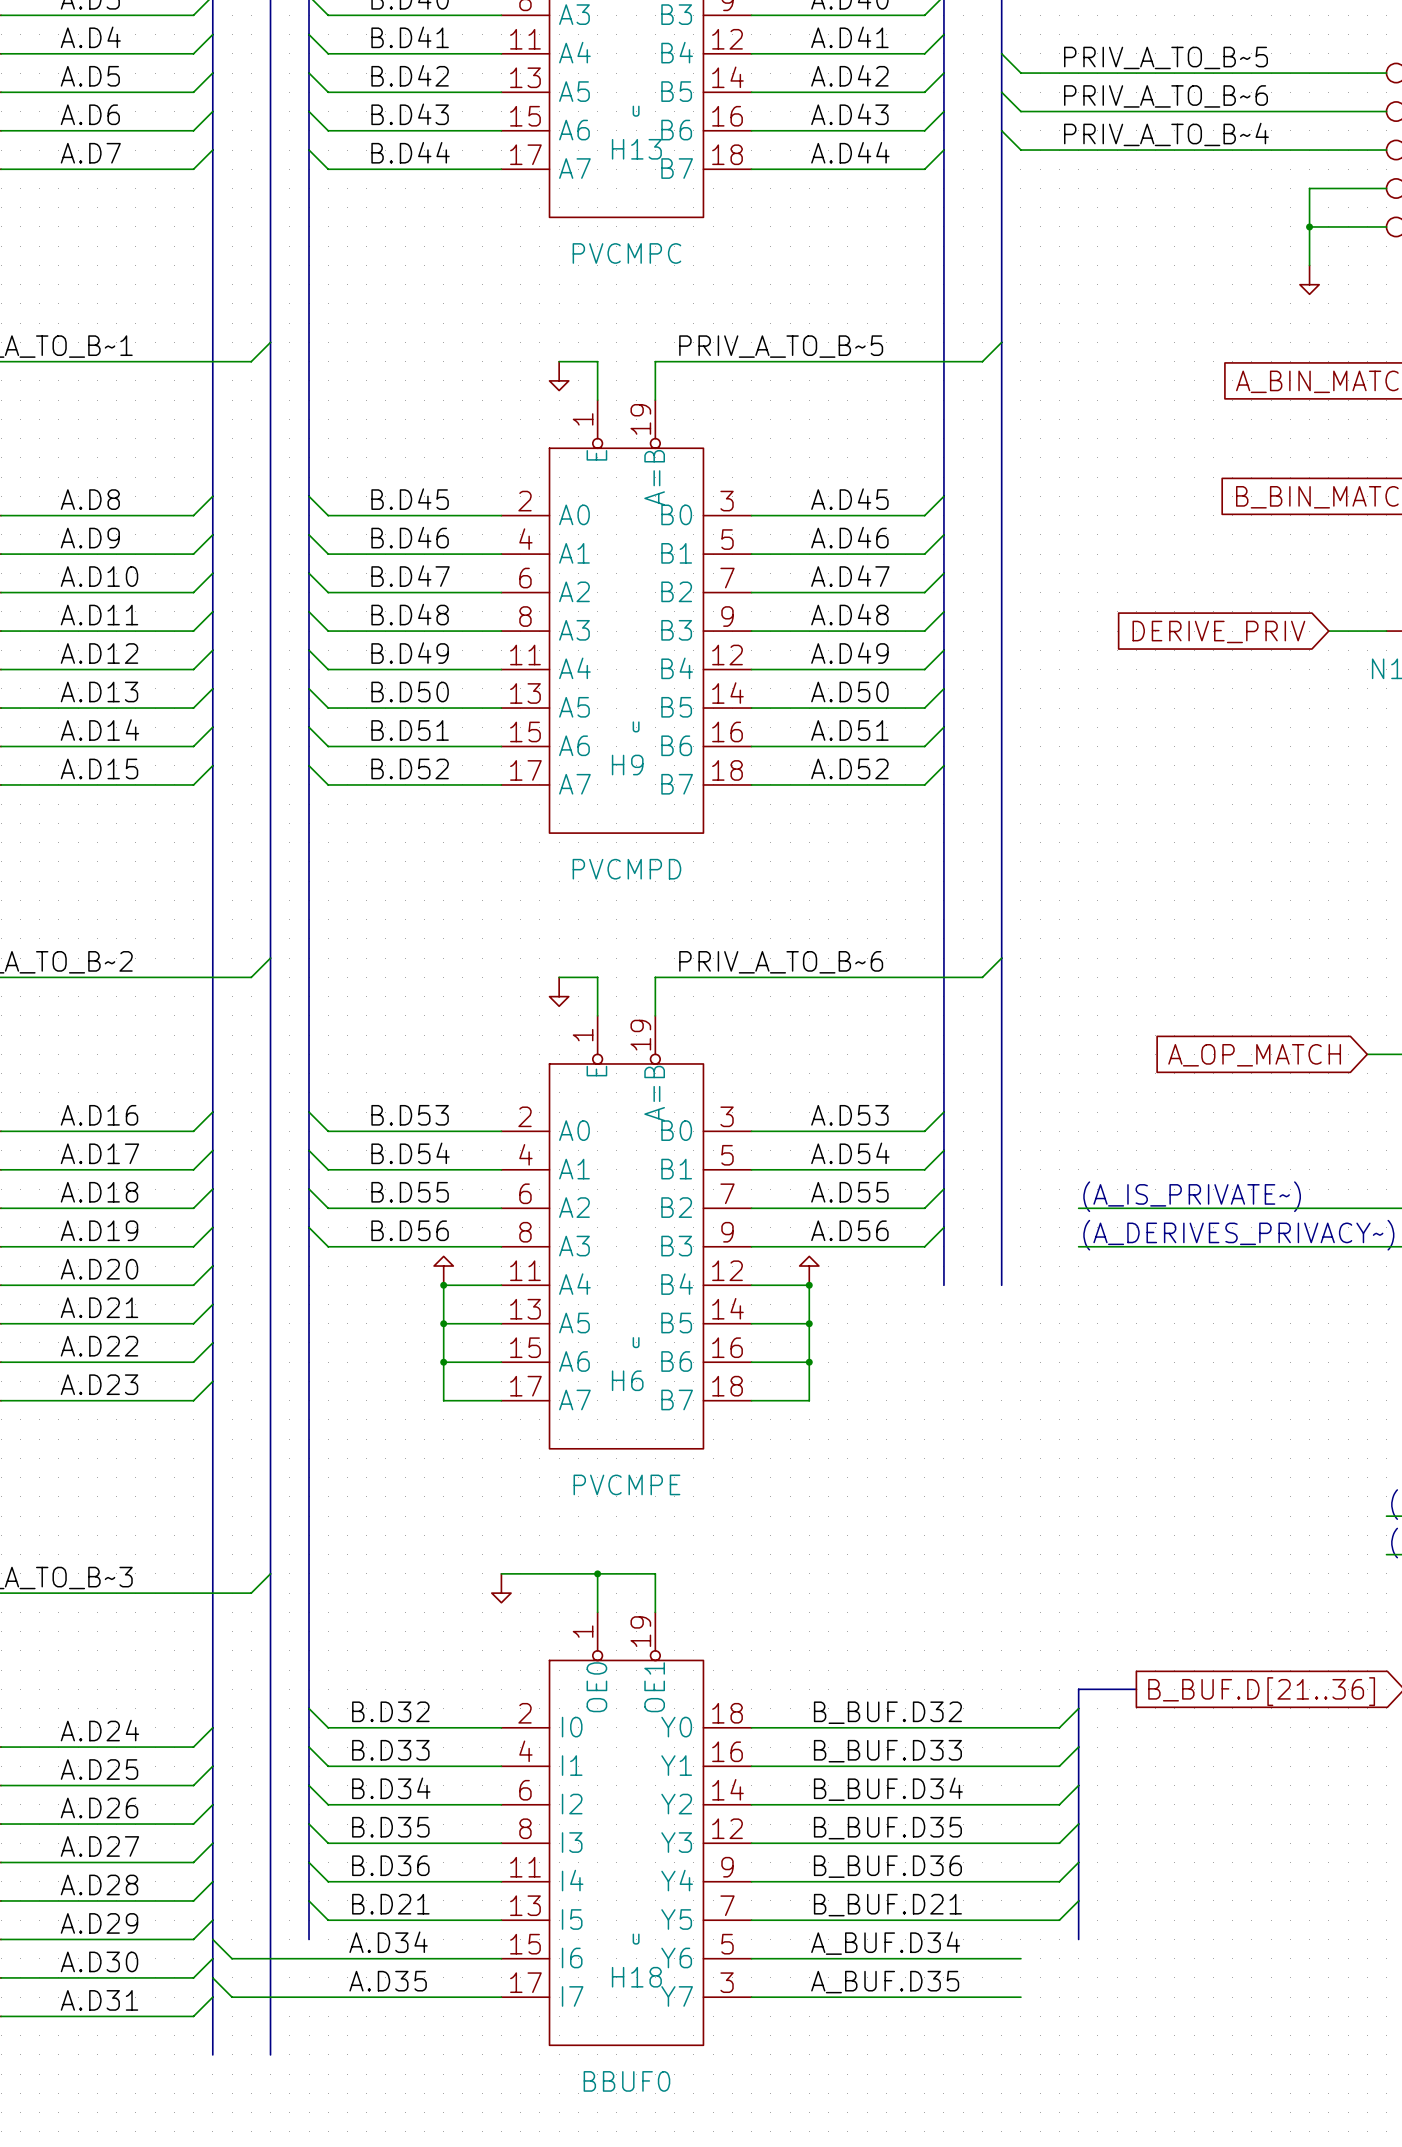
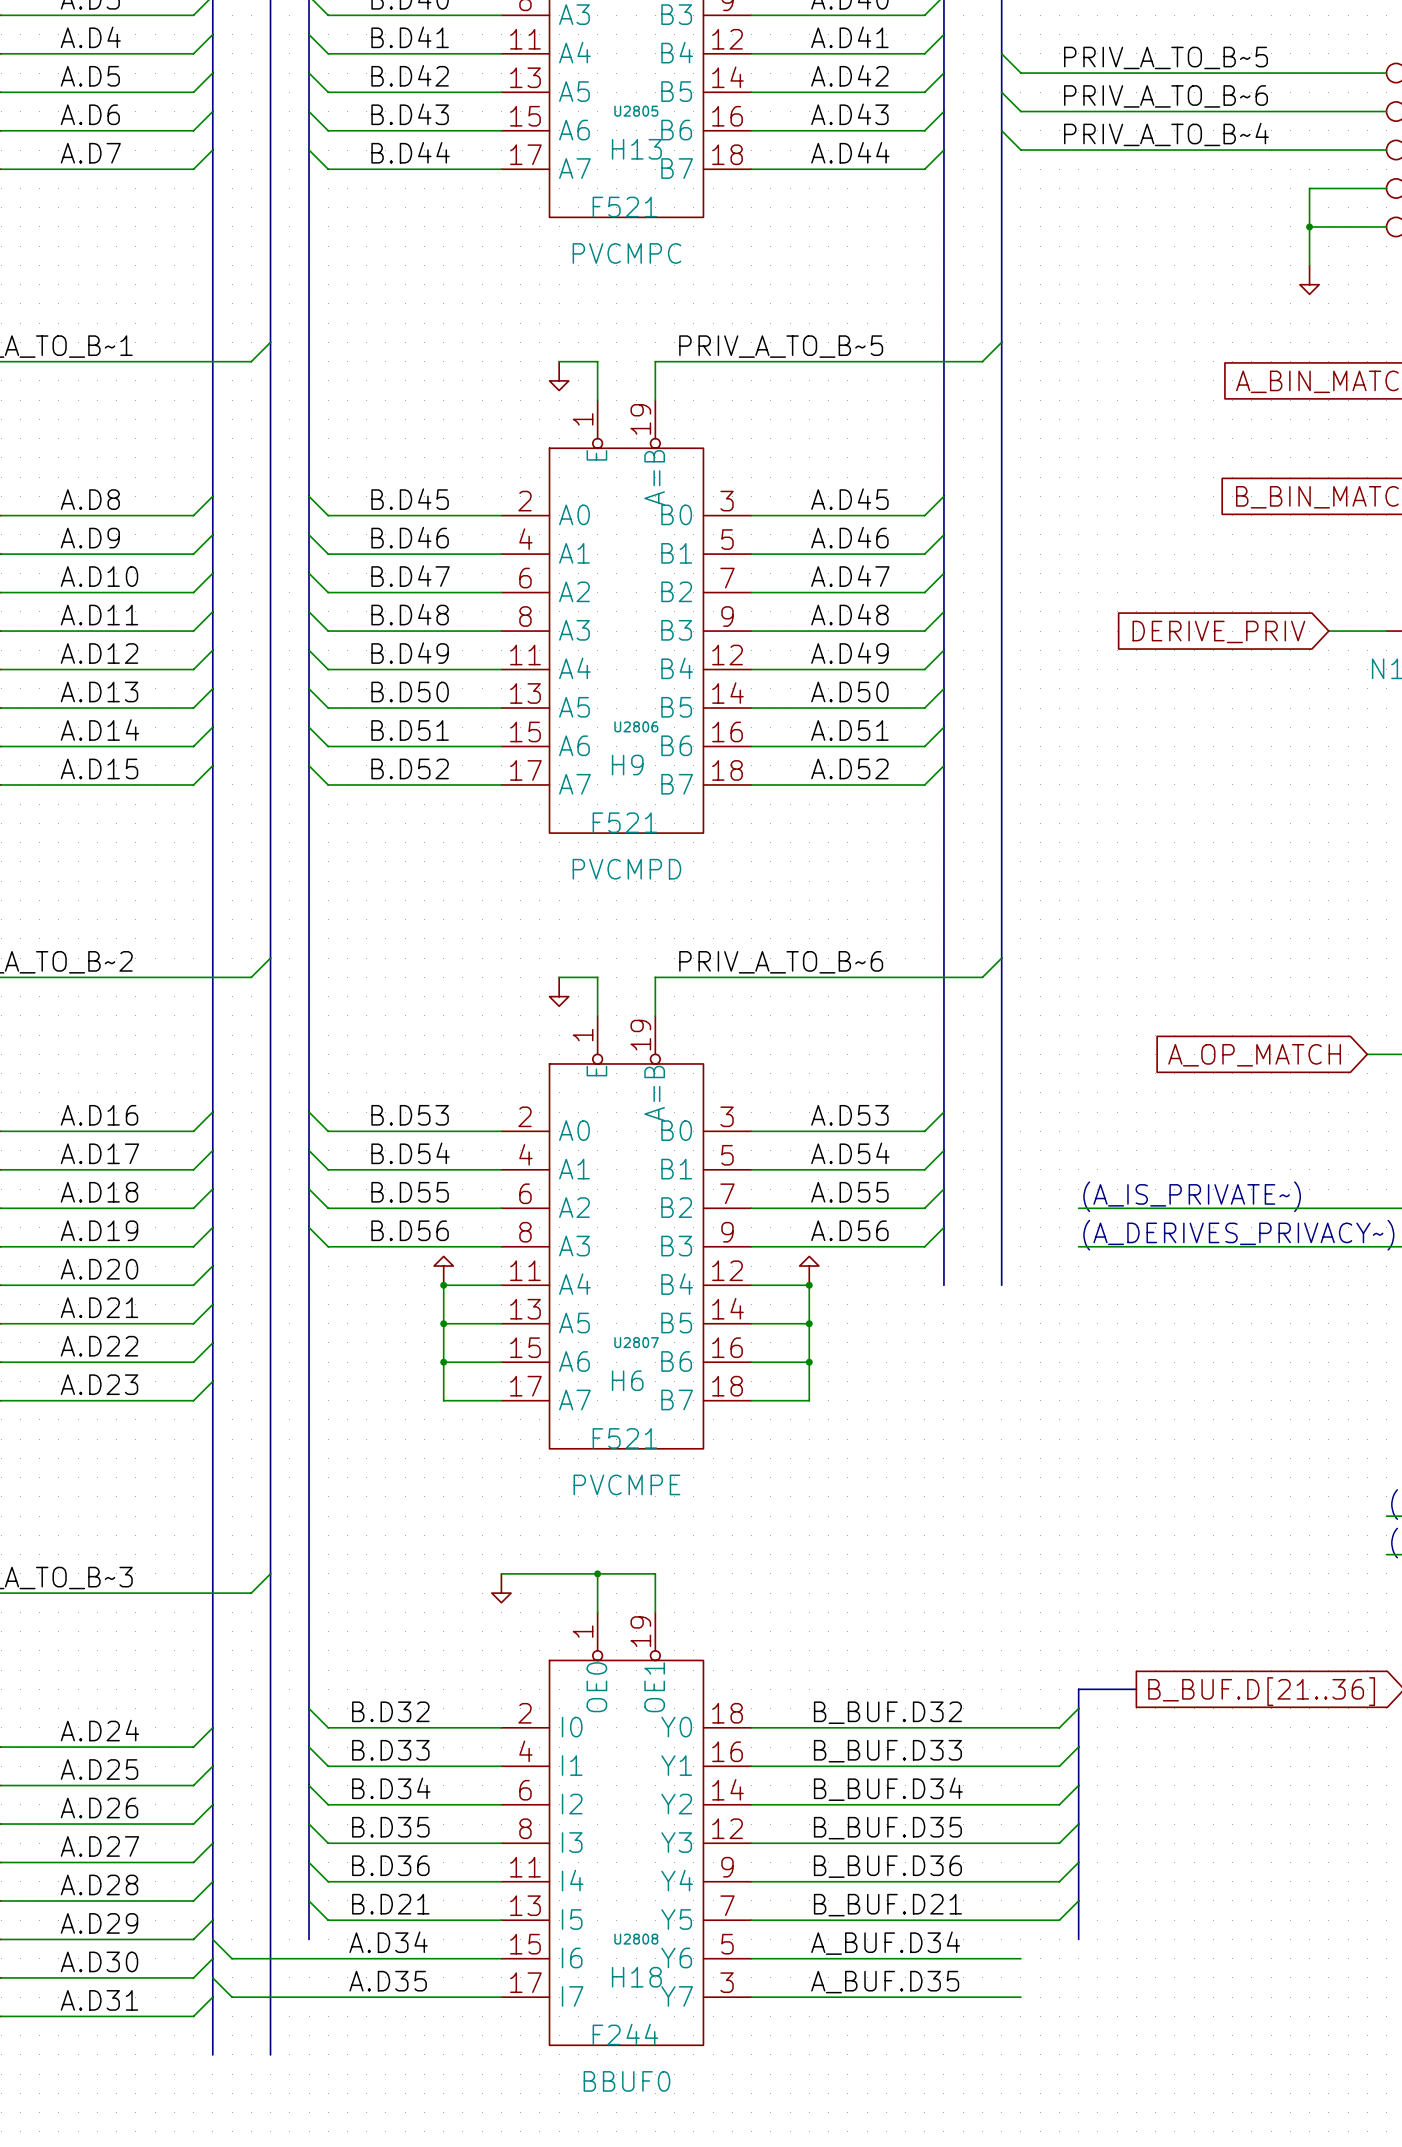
U name: U (636, 111) -> U2805 (636, 111)
U value: none -> F521 (624, 207)
U name: U (636, 726) -> U2806 (636, 726)
U value: none -> F521 (624, 822)
U name: U (636, 1342) -> U2807 (636, 1342)
U value: none -> F521 (624, 1438)
U name: U (636, 1939) -> U2808 (636, 1939)
U value: none -> F244 (625, 2034)

